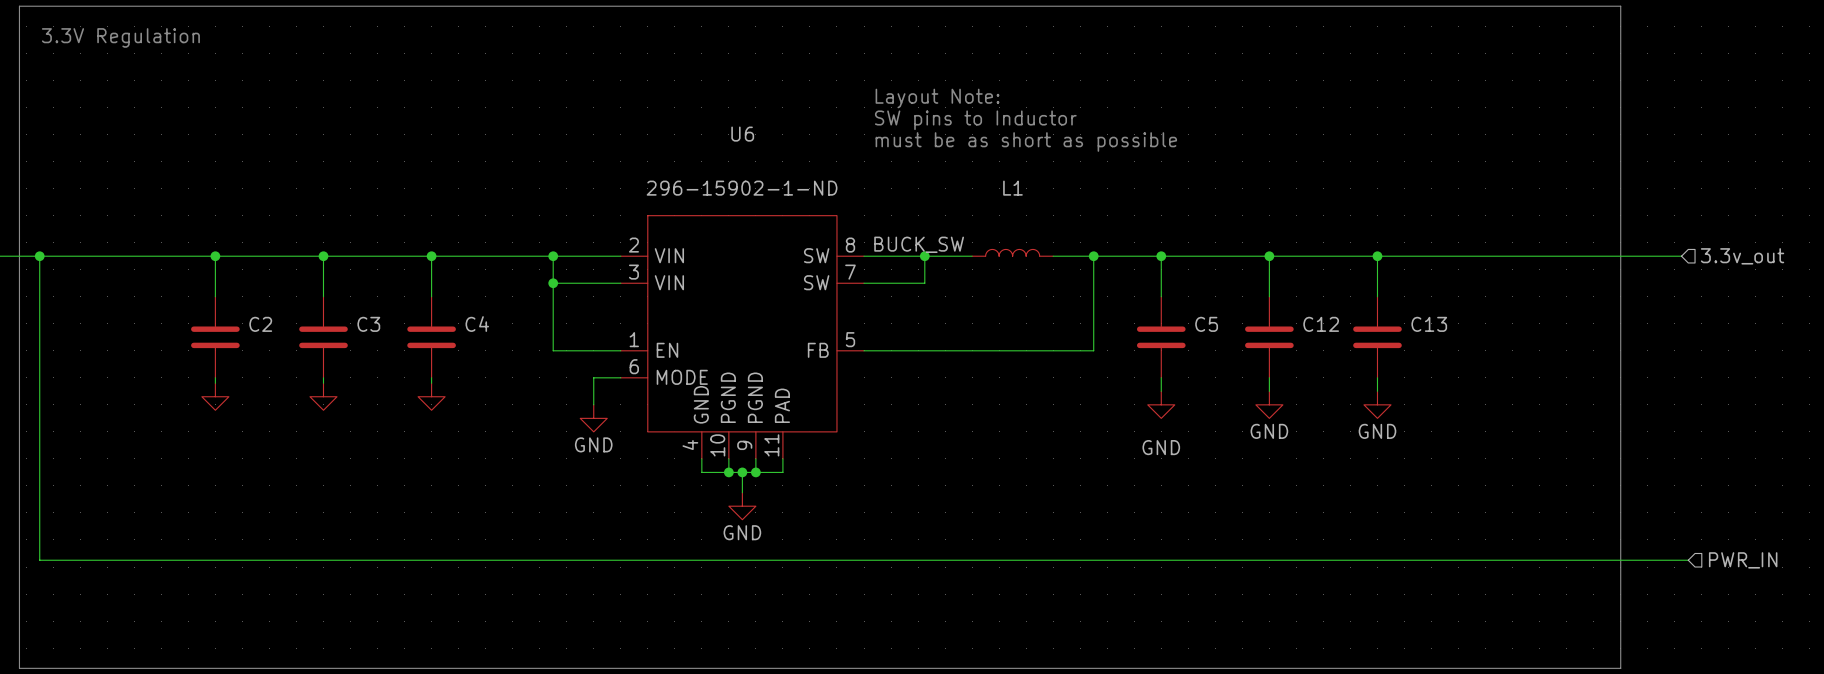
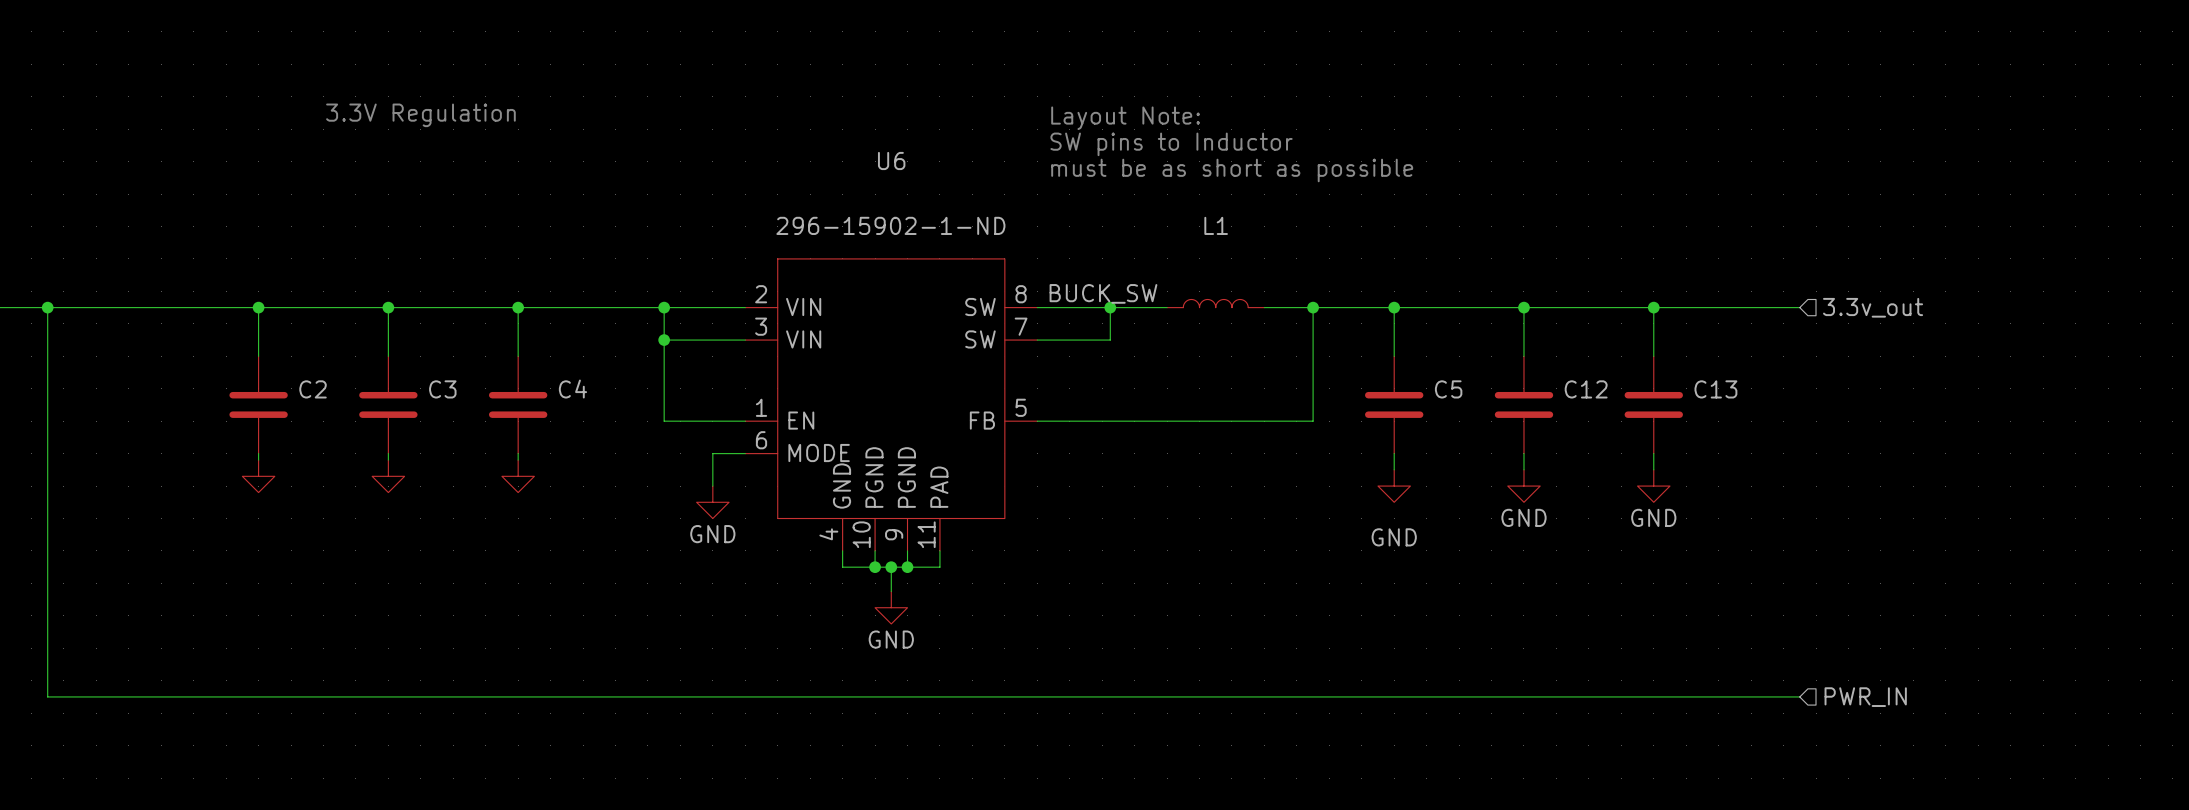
line: (19, 6) (19, 668) (1620, 668) (1620, 6) (19, 6) -> none
text position: 3.3V Regulation (120, 37) -> 3.3V Regulation (420, 115)
wire: (1499, 256) (1681, 256) -> none
hierarchical label position: 3.3v_out (1742, 256) -> 3.3v_out (1873, 307)
wire: (39, 560) (1688, 560) -> (47, 672) (47, 696) (1799, 696)
hierarchical label position: PWR_IN (1743, 560) -> PWR_IN (1865, 697)

